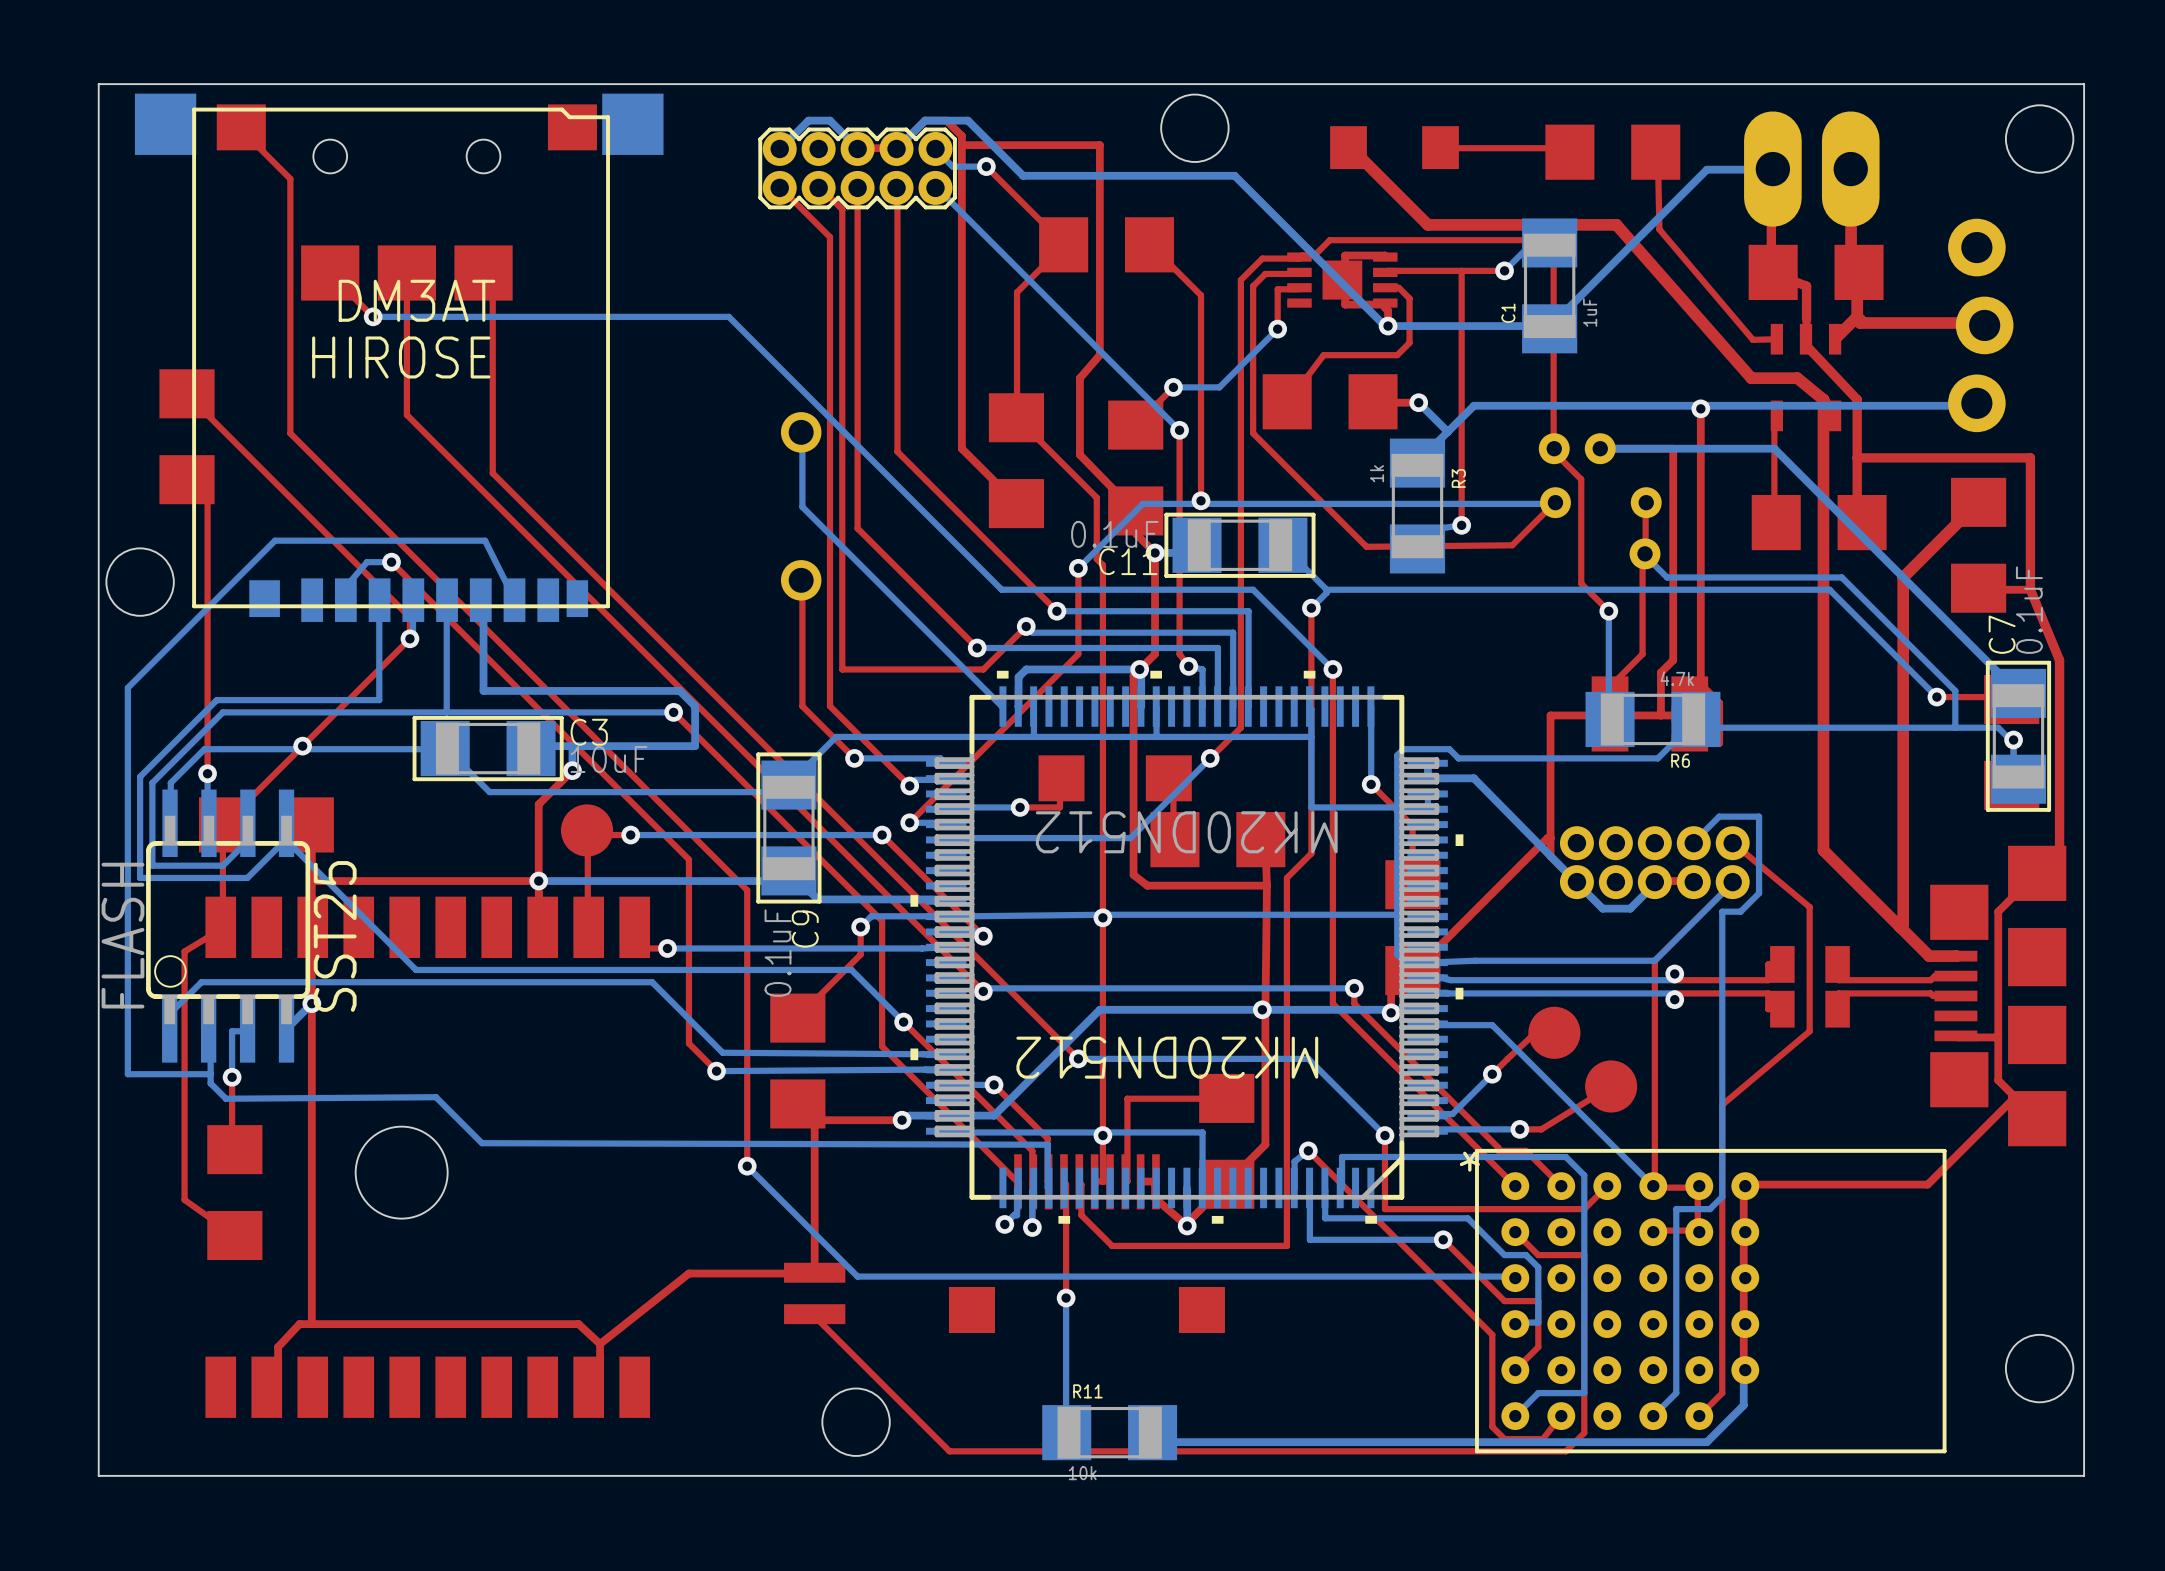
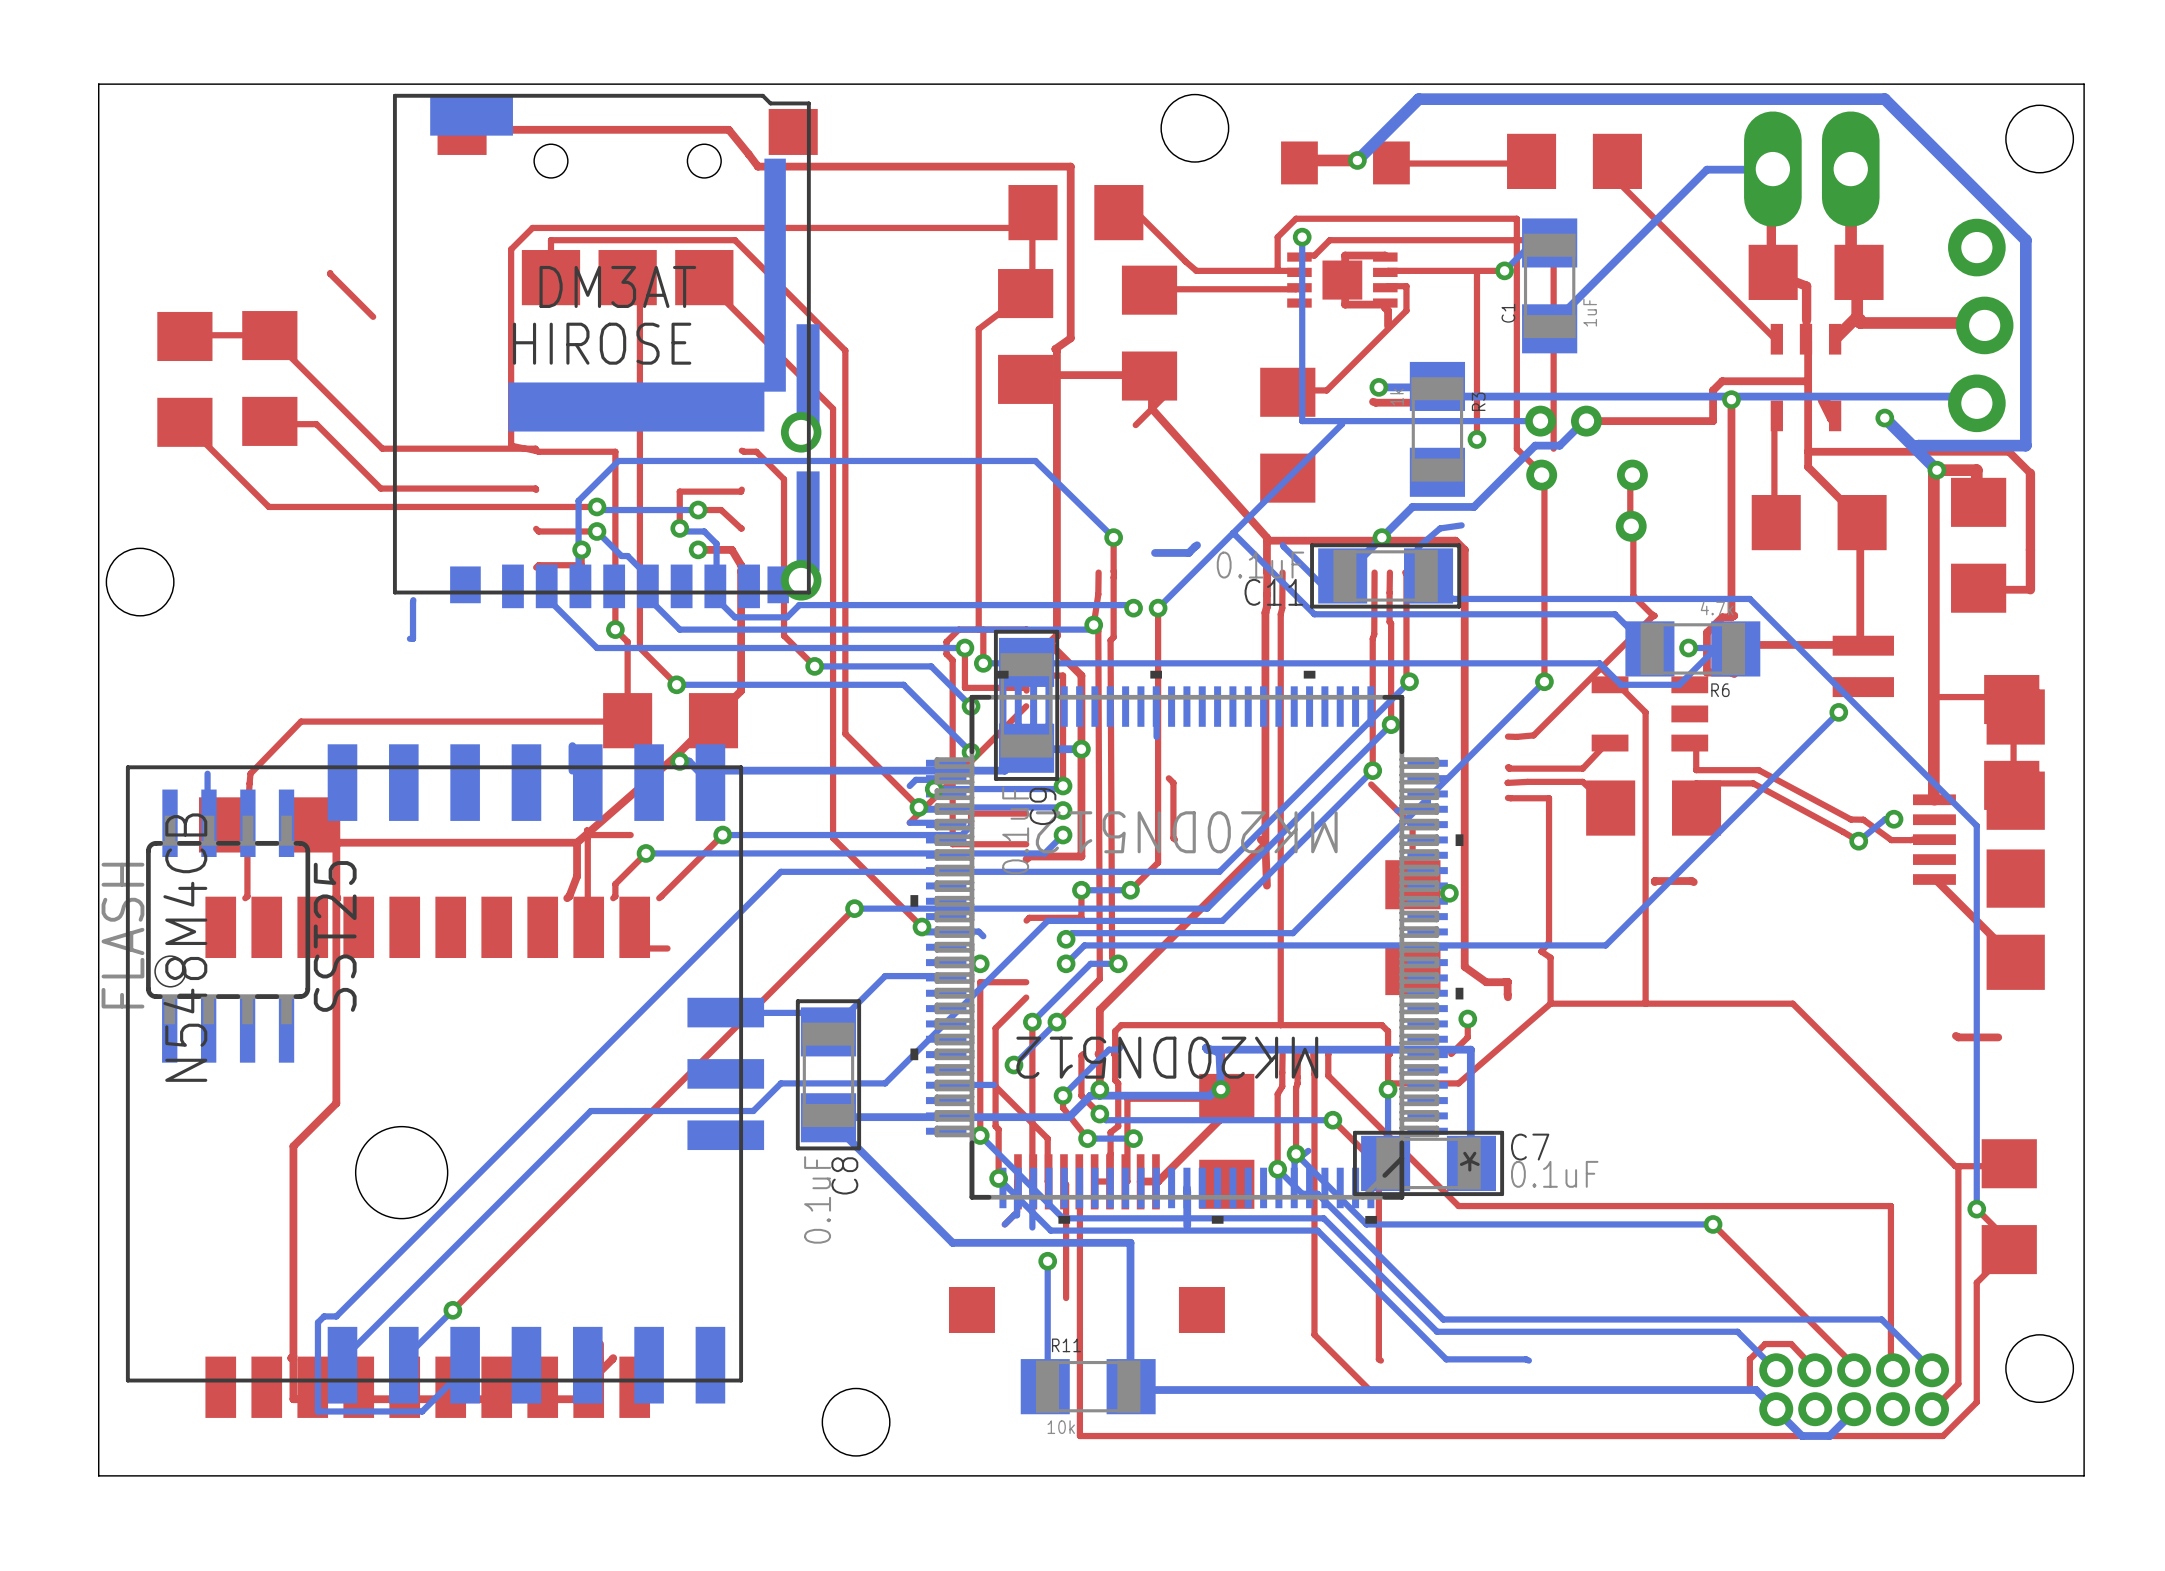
top track: (241, 127) (241, 129) (290, 178) (290, 433) (747, 890) (747, 1166) -> none
top track: none -> (462, 131) (462, 129) (728, 129) (757, 166) (1070, 166) (1070, 338) (1055, 349) (1056, 350) (1056, 635) (1050, 641) (1050, 644)
top track: (961, 145) (1099, 145) (1099, 355) (1079, 378) (1079, 454) (1135, 510) (1136, 534) (1155, 552) (1155, 654) (1133, 675) (1133, 874) (1147, 885) (1266, 885) (1265, 1009) -> none
top track: (1348, 147) (1427, 224) (1616, 224) (1751, 378) (1797, 378) (1823, 399) (1823, 850) (1929, 956) (1956, 956) -> none
part position: (1394, 147) -> (1345, 162)
top track: (1440, 147) (1568, 148) (1569, 152) -> none
top track: (857, 148) (896, 148) (925, 120) (946, 120) (961, 135) (961, 448) (1016, 503) -> none
bottom track: (857, 148) (830, 120) (808, 120) (779, 148) -> none
bottom track: (896, 148) (925, 120) (967, 120) (1023, 175) (1234, 175) (1384, 326) (1547, 326) (1549, 328) -> none
bottom track: (935, 148) (952, 166) (986, 166) -> none
part position: (1612, 152) -> (1574, 161)
top track: (1655, 152) (1657, 154) (1659, 229) (1752, 339) (1776, 339) -> (1617, 161) (1618, 181) (1776, 339)
top track: none -> (1357, 160) (1302, 160) (1299, 162)
bottom track: none -> (1357, 160) (1418, 99) (1884, 99) (2025, 240) (2025, 445) (1918, 445) (1915, 448)
via: none -> (1357, 160)
top track: none -> (1531, 161) (1529, 163) (1391, 162)
top track: (986, 166) (1063, 244) (1017, 292) (1016, 417) (1096, 497) (1096, 559) (1102, 565) (1102, 1181) -> none
via: (986, 166) -> none
part: (857, 168) -> none
top track: (779, 187) (830, 237) (830, 706) (909, 785) -> none
top track: (818, 187) (842, 209) (842, 669) (983, 669) (1026, 626) -> none
top track: (857, 187) (857, 528) (977, 648) -> none
top track: (896, 187) (897, 451) (1056, 611) -> none
bottom track: (935, 187) (1179, 430) -> none
part position: (406, 202) -> (627, 207)
top track: none -> (1032, 212) (1029, 227) (532, 227) (511, 249) (511, 445) (536, 451)
top track: none -> (1032, 212) (1032, 286) (1025, 293) (978, 329) (978, 629)
bottom track: none -> (1302, 237) (1302, 421) (1540, 421)
via: none -> (1302, 237)
part position: (1106, 244) -> (1075, 212)
top track: (1149, 244) (1201, 295) (1201, 500) -> none
top track: (1299, 257) (1299, 258) (1262, 258) (1240, 280) (1240, 727) (1210, 758) -> none
top track: none -> (1277, 270) (1277, 237) (1296, 218) (1516, 218) (1516, 448) (1544, 476) (1544, 681)
top track: (1461, 270) (1461, 525) -> none
top track: (1299, 272) (1299, 273) (1265, 273) (1253, 286) (1253, 433) (1366, 546) (1512, 545) (1555, 502) -> (1299, 272) (1299, 270) (1196, 270) (1136, 212) (1118, 212)
top track: (406, 273) (406, 414) (639, 648) -> (627, 277) (627, 280) (639, 292) (639, 648)
top track: (483, 273) (492, 283) (492, 473) (1078, 1058) -> none
top track: none -> (1476, 273) (1476, 439)
top track: none -> (550, 277) (550, 240) (734, 240) (845, 350) (845, 733) (918, 807)
top track: none -> (704, 277) (704, 280) (833, 408) (833, 838) (922, 927)
top track: (1385, 287) (1398, 287) (1409, 298) (1409, 342) (1397, 355) (1323, 355) (1287, 401) -> (1385, 287) (1406, 286) (1406, 310) (1326, 390) (1289, 390) (1287, 392)
top track: (1277, 289) (1277, 329) -> (1277, 289) (1149, 290)
bottom track: (373, 316) (728, 316) (1001, 589) (1253, 589) (1332, 669) -> none
via: (373, 316) -> none
via: (1388, 326) -> none
bottom track: (1277, 329) (1219, 387) (1173, 387) -> none
via: (1277, 329) -> none
part: none -> (1149, 333)
top track: none -> (184, 336) (269, 335) (382, 448) (535, 448) (536, 451)
part: none -> (1025, 336)
top track: (1808, 347) (1857, 399) (1857, 510) (1860, 519) -> (1808, 347) (1808, 467) (1860, 519)
part: none -> (606, 351)
part: (399, 357) -> none
top track: none -> (1056, 375) (1149, 376) (1151, 378) (1151, 408) (1266, 537) (1265, 844) (1099, 1009) (1099, 1089)
part: none -> (269, 378)
part: none -> (184, 379)
top track: none -> (1808, 381) (1722, 381) (1713, 390) (1713, 421) (1586, 421)
via: (1173, 387) -> none
via: none -> (1378, 387)
top track: (187, 393) (409, 617) (409, 638) (223, 824) (222, 927) (184, 951) (184, 1199) (234, 1235) -> none
top track: none -> (1731, 399) (1731, 614) (1734, 615) (1722, 617) (1706, 632) (1706, 672) (1734, 674)
part rotation: 0° (1330, 401) -> 90° clockwise (1287, 435)
bottom track: (1418, 402) (1447, 431) -> none
via: (1418, 402) -> none
bottom track: (1976, 403) (1976, 405) (1473, 405) (1417, 463) -> (1976, 403) (1970, 396) (1449, 396) (1437, 386) (1378, 387)
top track: (1700, 408) (1700, 681) (1689, 684) (1700, 684) (1719, 703) (1719, 743) (1689, 743) -> none
via position: (1700, 408) -> (1731, 399)
bottom track: none -> (1884, 418) (1936, 470)
via: none -> (1884, 418)
top track: none -> (269, 421) (271, 424) (316, 424) (380, 488) (536, 489)
bottom track: none -> (1342, 421) (1342, 424) (1158, 608)
bottom track: none -> (1586, 421) (1559, 445) (1535, 445) (1473, 506) (1412, 506) (1342, 575)
top track: none -> (184, 422) (268, 506) (596, 506)
top track: (1179, 430) (1179, 654) (1188, 666) -> none
via: (1179, 430) -> none
bottom track: (801, 432) (802, 506) (1002, 706) -> none
part: (187, 436) -> none
via: none -> (1476, 439)
top track: (1554, 448) (1553, 451) (1581, 479) (1581, 583) (1608, 611) -> none
top track: (1600, 448) (1673, 448) (1673, 660) (1660, 672) (1660, 715) -> none
bottom track: (1600, 448) (1774, 448) (2018, 693) -> none
top track: none -> (741, 450) (756, 451) (784, 479) (784, 635) (814, 666)
top track: none -> (536, 451) (615, 451) (615, 629) (627, 641) (627, 720) (301, 721) (250, 773) (247, 819) (247, 896) (245, 898)
top track: (1857, 457) (2030, 457) (2030, 473) -> (1808, 451) (2008, 451) (2030, 473)
part: (1016, 460) -> none
part: (1135, 468) -> none
via: none -> (1936, 470)
top track: none -> (1632, 475) (1630, 476) (1630, 525) (1633, 528) (1633, 595) (1654, 615) (1533, 735) (1507, 736)
top track: (187, 479) (207, 500) (207, 773) -> none
top track: none -> (741, 489) (741, 491) (679, 491) (679, 528)
via: (1201, 500) -> none
part position: (1600, 501) -> (1586, 473)
bottom track: (1555, 502) (1142, 503) (1078, 568) -> none
top track: (1646, 502) (1645, 552) (1642, 556) (1642, 654) (1610, 684) -> none
top track: (1978, 502) (1903, 577) (1903, 923) (1900, 927) -> (1978, 502) (1976, 500) (1976, 470) (1936, 470) (1933, 473) (1934, 799)
bottom track: none -> (596, 506) (600, 510) (698, 510)
via: none -> (596, 506)
R3 position: (1417, 506) -> (1437, 429)
top track: none -> (698, 510) (721, 510) (741, 528)
via: none -> (698, 510)
top track: none -> (1862, 522) (1860, 525) (1860, 641) (1863, 645) (1734, 644)
via: (1461, 525) -> none
top track: none -> (536, 528) (538, 531) (596, 531)
bottom track: none -> (679, 528) (682, 531) (704, 531) (716, 543) (716, 598) (734, 617) (787, 617) (799, 605) (1130, 605) (1133, 608)
via: none -> (679, 528)
bottom track: none -> (596, 531) (621, 556) (627, 556) (646, 574) (646, 583) (649, 586) (649, 598) (679, 629) (1090, 629) (1093, 625)
via: none -> (596, 531)
bottom track: none -> (1233, 533) (1314, 614) (1614, 614) (1649, 648)
top track: none -> (1113, 537) (1113, 637) (1110, 640) (1112, 957) (1118, 963)
bottom track: none -> (1113, 537) (1035, 460) (618, 460) (578, 500) (578, 583) (580, 586)
via: none -> (1113, 537)
via: none -> (1381, 537)
top track: none -> (1266, 540) (1455, 540) (1464, 549) (1464, 966) (1486, 982) (1507, 981)
C11 position: (1239, 545) -> (1385, 575)
top track: none -> (581, 549) (581, 565) (538, 565) (536, 567)
via: none -> (581, 549)
top track: none -> (698, 549) (731, 549) (741, 567) (741, 690) (713, 720) (675, 756)
via: none -> (698, 549)
via: (1155, 552) -> none
bottom track: (1645, 553) (1667, 577) (1841, 577) (1955, 690) (1955, 727) -> none
top track: (391, 562) (688, 859) (688, 1043) (716, 1071) -> none
bottom track: (391, 562) (367, 562) (348, 583) (348, 598) (345, 600) -> none
via: (391, 562) -> none
top track: (1078, 568) (1078, 654) (1026, 706) -> none
via: (1078, 568) -> none
top track: none -> (1098, 572) (1098, 594) (1093, 625) (1098, 631) (1099, 979) (1056, 1022)
top track: none -> (1282, 572) (1280, 614) (1280, 1025)
top track: none -> (1374, 572) (1372, 770)
top track: none -> (1389, 572) (1391, 724)
top track: none -> (1405, 572) (1406, 678) (1409, 681)
bottom track: none -> (1428, 575) (1452, 598) (1749, 598) (1976, 825) (1976, 1209)
top track: (801, 580) (802, 706) (854, 758) -> none
bottom track: none -> (546, 586) (547, 598) (596, 648) (964, 648)
top track: (2030, 589) (2059, 660) (2059, 859) (2038, 871) (1998, 911) (1998, 1080) (2037, 1118) (2013, 1098) (1927, 1184) (1746, 1184) (1743, 1187) (1745, 1232) (1743, 1233) (1745, 1278) (1743, 1279) (1745, 1324) (1743, 1368) (1745, 1370) -> none
bottom track: (379, 600) (379, 700) (216, 700) (140, 776) (140, 877) (247, 877) (284, 841) (284, 825) (286, 823) (287, 841) (416, 969) (851, 969) (903, 1022) -> none
bottom track: (447, 600) (446, 712) -> none
bottom track: (480, 600) (483, 602) (483, 690) (679, 690) (695, 706) (695, 746) (532, 746) (531, 748) -> none
bottom track: (514, 600) (485, 540) (275, 540) (127, 687) (127, 1074) (210, 1074) -> none
via: none -> (1133, 608)
top track: none -> (1158, 608) (1158, 862) (1130, 890)
via: none -> (1158, 608)
top track: (1311, 608) (1311, 853) (1286, 877) (1286, 1245) (1112, 1245) (1081, 1215) (1081, 1184) (1079, 1181) -> (1976, 1209) (2007, 1239) (2007, 1248) (2009, 1249) (1976, 1282) (1976, 1402) (1943, 1436) (1079, 1436) (1079, 1181)
bottom track: (1311, 608) (1326, 592) (1326, 589) (1829, 589) (1936, 697) -> none
via: (1311, 608) -> none
bottom track: (1056, 611) (1248, 611) (1248, 706) -> none
via: (1056, 611) -> none
bottom track: (1608, 611) (1610, 719) -> none
via: (1608, 611) -> none
via: none -> (1093, 625)
bottom track: (1026, 626) (1032, 632) (1233, 632) (1233, 706) -> none
via: (1026, 626) -> none
via: none -> (615, 629)
top track: none -> (983, 629) (983, 663)
top track: none -> (1026, 629) (958, 629) (946, 641) (946, 654) (952, 660) (952, 844) (1026, 844)
via: (409, 638) -> none
top track: none -> (1050, 644) (1081, 675) (1081, 856) (1029, 856) (1026, 859)
top track: none -> (964, 648) (964, 687) (1026, 687) (1026, 690)
via: none -> (964, 648)
bottom track: (977, 648) (1217, 648) (1217, 706) -> none
via: (977, 648) -> none
bottom track: none -> (1688, 648) (1735, 648) (1713, 651) (1679, 684) (1621, 684) (1599, 663) (983, 663)
via: none -> (1688, 648)
via: none -> (983, 663)
bottom track: none -> (814, 666) (931, 666) (971, 706)
via: none -> (814, 666)
bottom track: (1188, 666) (1202, 669) (1202, 706) -> none
via: (1188, 666) -> none
part: none -> (1863, 666)
top track: none -> (1601, 667) (1645, 712) (1645, 1003)
via: (1139, 669) -> none
top track: (1332, 669) (1332, 1003) (1515, 1186) -> none
via: (1332, 669) -> none
top track: none -> (1026, 675) (1063, 675) (1063, 785)
bottom track: none -> (1409, 681) (1219, 871) (780, 871) (336, 1316) (324, 1316) (317, 1322) (317, 1411) (422, 1411) (465, 1368) (465, 1365)
via: none -> (1409, 681)
bottom track: none -> (1544, 681) (1293, 933) (1072, 933) (1066, 939)
via: none -> (1544, 681)
top track: (676, 684) (983, 991) -> none
bottom track: none -> (676, 684) (903, 684) (971, 752)
via: none -> (676, 684)
via: (1936, 697) -> none
via: none -> (971, 706)
bottom track: (1141, 706) (1141, 669) (1026, 669) (1018, 677) (1018, 706) -> none
bottom track: (1309, 706) (1311, 709) (1311, 807) (1397, 807) -> none
bottom track: (1370, 706) (1371, 784) -> none
top track: (673, 712) (882, 920) (882, 1046) (1017, 1181) -> none
bottom track: (673, 712) (222, 712) (152, 782) (152, 865) (222, 865) (247, 841) (247, 823) -> none
via: (673, 712) -> none
bottom track: none -> (1838, 712) (1605, 945) (1084, 945) (1066, 963)
via: none -> (1838, 712)
top track: (1689, 713) (1688, 715) (1550, 715) (1550, 856) (1576, 882) -> none
R6 position: (1652, 719) -> (1692, 648)
bottom track: none -> (1391, 724) (1207, 908) (854, 908)
via: none -> (1391, 724)
bottom track: (1311, 736) (836, 736) (780, 792) (489, 792) (445, 748) (204, 749) (170, 782) (170, 823) -> none
C7 rotation: 0° (2018, 736) -> 90° clockwise (1428, 1163)
C7 position: (2018, 736) -> (1428, 1163)
via: (2013, 739) -> none
top track: none -> (1610, 742) (1607, 742) (1582, 768) (1507, 767)
top track: none -> (1696, 742) (1696, 770) (1758, 770) (1851, 819) (1863, 819) (1891, 840) (1934, 839)
via: (302, 746) -> none
C3 side: bottom (488, 748) -> top (670, 720)
bottom track: none -> (1081, 749) (1026, 748) (1004, 770) (719, 770) (710, 779) (710, 782) (688, 761) (679, 761)
via: none -> (1081, 749)
via: none -> (971, 752)
top track: none -> (675, 756) (577, 842)
bottom track: (854, 758) (940, 758) (946, 763) -> none
via: (854, 758) -> none
bottom track: (1210, 758) (1130, 838) (946, 838) (946, 839) -> none
via: (1210, 758) -> none
via: none -> (679, 761)
bottom track: (1427, 763) (1427, 778) (1473, 778) (1602, 908) (1630, 908) (1654, 882) -> none
top track: (572, 770) (538, 804) (538, 893) (542, 927) -> none
via: (572, 770) -> none
bottom track: none -> (1372, 770) (1222, 920) (1047, 920) (885, 1083) (780, 1083) (753, 1111) (590, 1111) (342, 1359) (342, 1365)
via: (207, 773) -> none
top track: (1061, 778) (1059, 807) (1020, 807) -> none
part: (1115, 778) -> none
bottom track: (2018, 779) (2013, 776) (2013, 739) (2010, 739) (1998, 727) (1691, 727) (1695, 719) (1657, 758) (1458, 758) (1449, 749) (1403, 749) (1397, 755) (1397, 954) (1404, 962) (1654, 960) (1732, 882) -> none
top track: none -> (1507, 782) (1582, 781) (1610, 808)
top track: none -> (335, 783) (337, 898) (336, 1103) (293, 1146) (293, 1356) (291, 1358) (293, 1359) (293, 1399) (584, 1399) (593, 1390) (593, 1377) (613, 1358)
via position: (1371, 784) -> (1372, 770)
via: (909, 785) -> none
bottom track: none -> (1063, 785) (1059, 789) (934, 789)
via: none -> (1063, 785)
via: none -> (934, 789)
top track: none -> (1507, 797) (1549, 798) (1549, 942) (1541, 951) (1550, 957) (1550, 1003)
bottom track: none -> (1020, 807) (1059, 807) (1063, 810)
via: (1020, 807) -> none
part: none -> (1653, 808)
top track: none -> (1696, 808) (1694, 807) (1696, 783) (1753, 783) (1858, 841)
via: none -> (1063, 810)
top track: none -> (1026, 813) (971, 813) (971, 825)
bottom track: none -> (1893, 819) (1885, 819) (1858, 841)
via: none -> (1893, 819)
via position: (909, 822) -> (918, 807)
top track: (309, 824) (311, 825) (312, 927) (311, 1324) -> none
bottom track: none -> (971, 825) (961, 835) (882, 835)
C9 position: (788, 827) -> (1026, 705)
part: (587, 830) -> none
via position: (630, 835) -> (646, 853)
top track: none -> (722, 835) (659, 898)
bottom track: (722, 835) (630, 835) -> none
via: none -> (722, 835)
top track: (882, 835) (983, 936) -> none
via: (882, 835) -> none
bottom track: none -> (1063, 835) (1044, 853) (646, 853)
via: none -> (1063, 835)
top track: (1550, 838) (1547, 838) (1415, 969) (1409, 973) (1391, 991) (1391, 1012) -> none
part: (1217, 839) -> none
part: none -> (1978, 839)
via: none -> (1858, 841)
top track: none -> (577, 842) (577, 876) (567, 898)
top track: none -> (577, 842) (336, 842)
bottom track: (1693, 843) (1719, 816) (1759, 816) (1759, 893) (1740, 911) (1722, 911) (1722, 1196) (1710, 1209) (1676, 1209) (1676, 1393) (1653, 1416) -> none
top track: (1732, 843) (1809, 907) (1809, 1031) (1722, 1104) (1722, 1393) (1699, 1416) -> none
top track: none -> (646, 853) (615, 884) (615, 896) (613, 898)
part position: (1654, 862) -> (1854, 1389)
top track: none -> (1934, 879) (2013, 957) (2015, 962)
top track: (538, 881) (311, 881) -> none
bottom track: (538, 881) (777, 881) (788, 870) (817, 899) (943, 899) (946, 901) -> none
via: (538, 881) -> none
top track: (1732, 882) (1654, 960) (1654, 1184) (1653, 1186) (1657, 1184) (1657, 1187) (1699, 1186) (1697, 1187) (1699, 1232) (1694, 1230) (1653, 1232) -> none
top track: none -> (1081, 890) (1081, 917) (1029, 917) (1026, 920)
via: none -> (1081, 890)
bottom track: none -> (1130, 890) (1081, 890)
via: none -> (1130, 890)
via: none -> (1449, 893)
top track: none -> (854, 908) (452, 1310)
bottom track: (1102, 914) (871, 916) (860, 927) -> none
bottom track: (1397, 914) (1102, 914) -> none
via: (1102, 917) -> none
top track: (860, 927) (860, 954) (797, 1018) -> none
via position: (860, 927) -> (854, 908)
via: none -> (922, 927)
via: (983, 936) -> none
via: none -> (1066, 939)
bottom track: (946, 947) (667, 948) -> none
via: (667, 948) -> none
via: none -> (980, 963)
via: none -> (1066, 963)
bottom track: none -> (1118, 963) (1090, 963) (1032, 1022)
via: none -> (1118, 963)
top track: (1782, 964) (1768, 964) (1768, 980) (1674, 980) (1674, 973) -> none
part: (1809, 964) -> none
top track: (1837, 964) (1835, 966) (1835, 979) (1838, 980) (1930, 980) (1934, 976) (1955, 976) -> none
bottom track: (1674, 973) (1674, 980) (1450, 980) (1443, 977) (1427, 977) -> none
via: (1674, 973) -> none
bottom track: none -> (958, 976) (885, 976) (828, 1031) (808, 1012) (725, 1012)
top track: none -> (1026, 982) (980, 982) (980, 1135)
top track: none -> (1507, 982) (1507, 997)
top track: (1354, 988) (1354, 1003) (1498, 1147) (1498, 1150) (1526, 1150) (1561, 1186) -> none
bottom track: (1354, 988) (986, 988) (983, 991) -> none
via: (1354, 988) -> none
via: (983, 991) -> none
bottom track: (1427, 993) (1674, 993) (1674, 999) -> none
top track: (1955, 996) (1933, 996) (1930, 993) (1838, 993) (1835, 994) (1835, 1006) (1837, 1009) -> none
part: (1998, 996) -> none
top track: none -> (1026, 997) (995, 1028) (995, 1126) (998, 1129) (998, 1178)
top track: (1674, 999) (1674, 993) (1768, 993) (1768, 1009) (1782, 1009) -> none
via: (1674, 999) -> none
bottom track: (311, 1003) (286, 1028) -> none
via: (311, 1003) -> none
top track: none -> (1550, 1003) (1458, 1083) (1391, 1083) (1388, 1089) (1388, 1055) (1389, 1053) (1388, 1052) (1388, 1031) (1381, 1025) (1121, 1025) (1115, 1031) (1113, 1053) (1115, 1080) (1118, 1083) (1118, 1126) (1110, 1132) (1109, 1181)
top track: none -> (1550, 1003) (1792, 1003) (1955, 1166) (2007, 1166) (2009, 1163)
bottom track: (1427, 1008) (1099, 1009) (994, 1115) (909, 1115) (902, 1120) -> none
via: (1262, 1009) -> none
top track: (1265, 1009) (1265, 1144) (1188, 1221) (1187, 1225) (1155, 1198) (1155, 1181) -> (1221, 1053) (1219, 1120) (1155, 1181)
part: (1809, 1009) -> none
via: (1391, 1012) -> none
top track: none -> (1467, 1019) (1467, 1037) (1451, 1053)
via: none -> (1467, 1019)
top track: (903, 1022) (1032, 1150) -> (1032, 1022) (1032, 1150)
via: (903, 1022) -> none
via: none -> (1032, 1022)
bottom track: none -> (1056, 1022) (1013, 1065)
via: none -> (1056, 1022)
bottom track: (1427, 1023) (1492, 1025) (1653, 1186) -> none
bottom track: (169, 1028) (170, 1012) (201, 982) (652, 982) (722, 1052) (946, 1054) -> none
bottom track: (208, 1028) (210, 1031) (210, 1083) (225, 1098) (436, 1097) (482, 1143) (1047, 1144) (1048, 1187) -> none
bottom track: (247, 1028) (247, 1031) (232, 1031) (232, 1077) -> none
top track: (1554, 1032) (1530, 1037) (1492, 1074) -> none
part: (1554, 1032) -> none
bottom track: none -> (1120, 1047) (1118, 1049) (1109, 1049) (1063, 1095)
top track: none -> (1083, 1053) (1081, 1055) (1081, 1095) (1099, 1114)
top track: none -> (1282, 1053) (1282, 1086) (1277, 1094) (1277, 1169)
top track: none -> (1297, 1053) (1296, 1153)
top track: none -> (1313, 1053) (1314, 1334) (1369, 1390) (1749, 1390) (1749, 1359) (1765, 1344) (1791, 1344) (1815, 1370)
top track: none -> (1328, 1054) (1328, 1075) (1458, 1206) (1890, 1206) (1890, 1368) (1893, 1370)
bottom track: (1078, 1058) (1308, 1058) (1384, 1135) -> none
via: (1078, 1058) -> none
C8 side: top (797, 1061) -> bottom (828, 1074)
via: none -> (1013, 1065)
bottom track: (946, 1069) (716, 1071) -> none
via: (716, 1071) -> none
part: none -> (445, 1073)
bottom track: (1492, 1074) (1452, 1114) (1427, 1114) (1427, 1115) -> none
via: (1492, 1074) -> none
top track: (232, 1077) (232, 1147) (234, 1149) -> none
via: (232, 1077) -> none
via: (994, 1084) -> none
top track: (1611, 1086) (1541, 1129) (1519, 1129) -> none
part: (1611, 1086) -> none
via: none -> (1099, 1089)
via: none -> (1220, 1089)
bottom track: none -> (1388, 1089) (1388, 1163) (1385, 1163)
via: none -> (1388, 1089)
top track: none -> (1063, 1095) (1063, 1107) (1087, 1138)
via: none -> (1063, 1095)
bottom track: none -> (1099, 1114) (1105, 1120) (1332, 1120)
via: none -> (1099, 1114)
top track: (902, 1120) (817, 1120) (797, 1103) (814, 1120) (814, 1272) (688, 1273) (600, 1344) (578, 1324) (299, 1324) (278, 1347) (278, 1362) (268, 1386) (266, 1387) -> none
via: (902, 1120) -> none
top track: none -> (1332, 1120) (1378, 1166) (1378, 1359) (1380, 1360)
via: none -> (1332, 1120)
bottom track: (1519, 1129) (1427, 1129) (1427, 1131) -> none
via: (1519, 1129) -> none
bottom track: (946, 1131) (1202, 1132) (1202, 1187) -> none
bottom track: none -> (980, 1135) (1063, 1218) (1323, 1218) (1437, 1331) (1737, 1331) (1776, 1370)
via: none -> (980, 1135)
via position: (1102, 1135) -> (1087, 1138)
top track: (1384, 1135) (1384, 1209) (1584, 1209) (1607, 1186) -> none
via: (1384, 1135) -> none
bottom track: none -> (1133, 1138) (1087, 1138)
via: none -> (1133, 1138)
top track: (1308, 1150) (1492, 1334) (1492, 1426) (1504, 1439) (1542, 1439) (1561, 1416) -> none
via position: (1308, 1150) -> (1296, 1153)
bottom track: none -> (1296, 1153) (1366, 1224) (1713, 1224)
bottom track: none -> (1471, 1163) (1470, 1049) (1207, 1049) (1205, 1047) (1219, 1052) (1220, 1089) (1216, 1089) (1210, 1095) (1090, 1095) (1069, 1117) (828, 1117) (952, 1242) (1130, 1242) (1130, 1383) (1133, 1390) (1756, 1390) (1802, 1436) (1829, 1436) (1854, 1411) (1854, 1409)
bottom track: (747, 1166) (857, 1276) (1513, 1276) (1515, 1278) -> none
via: (747, 1166) -> none
top track: none -> (1958, 1166) (1958, 1383) (1932, 1409)
bottom track: none -> (1277, 1169) (1302, 1193) (1317, 1193) (1443, 1319) (1881, 1319) (1932, 1370)
via: none -> (1277, 1169)
bottom track: none -> (998, 1178) (1050, 1230) (1317, 1230) (1446, 1359) (1528, 1360)
via: none -> (998, 1178)
bottom track: (1309, 1187) (1309, 1239) (1443, 1239) -> none
bottom track: (1324, 1187) (1325, 1218) (1467, 1218) (1504, 1255) (1526, 1255) (1538, 1267) (1538, 1322) (1515, 1324) -> none
bottom track: (1340, 1187) (1342, 1187) (1342, 1156) (1565, 1156) (1584, 1175) (1584, 1393) (1538, 1393) (1515, 1416) -> none
part: (234, 1192) -> none
part: none -> (2009, 1206)
via: none -> (1976, 1209)
via: (1004, 1224) -> none
top track: none -> (1713, 1224) (1854, 1365) (1854, 1370)
via: none -> (1713, 1224)
via: (1187, 1225) -> none
via: (1032, 1227) -> none
top track: (1515, 1232) (1538, 1255) (1584, 1255) (1584, 1432) (1565, 1451) (949, 1451) (814, 1316) (814, 1314) -> none
top track: (1443, 1239) (1504, 1301) (1538, 1301) (1538, 1347) (1515, 1370) -> none
via: (1443, 1239) -> none
bottom track: none -> (1047, 1261) (1047, 1383) (1045, 1386)
via: none -> (1047, 1261)
part: (814, 1293) -> none
bottom track: (1066, 1298) (1066, 1432) -> none
via: (1066, 1298) -> none
part: (1710, 1301) -> none
bottom track: none -> (452, 1310) (403, 1359) (403, 1365)
via: none -> (452, 1310)
bottom track: (1745, 1370) (1743, 1405) (1706, 1442) (1164, 1442) (1152, 1432) -> none
R11 position: (1109, 1432) -> (1088, 1386)

